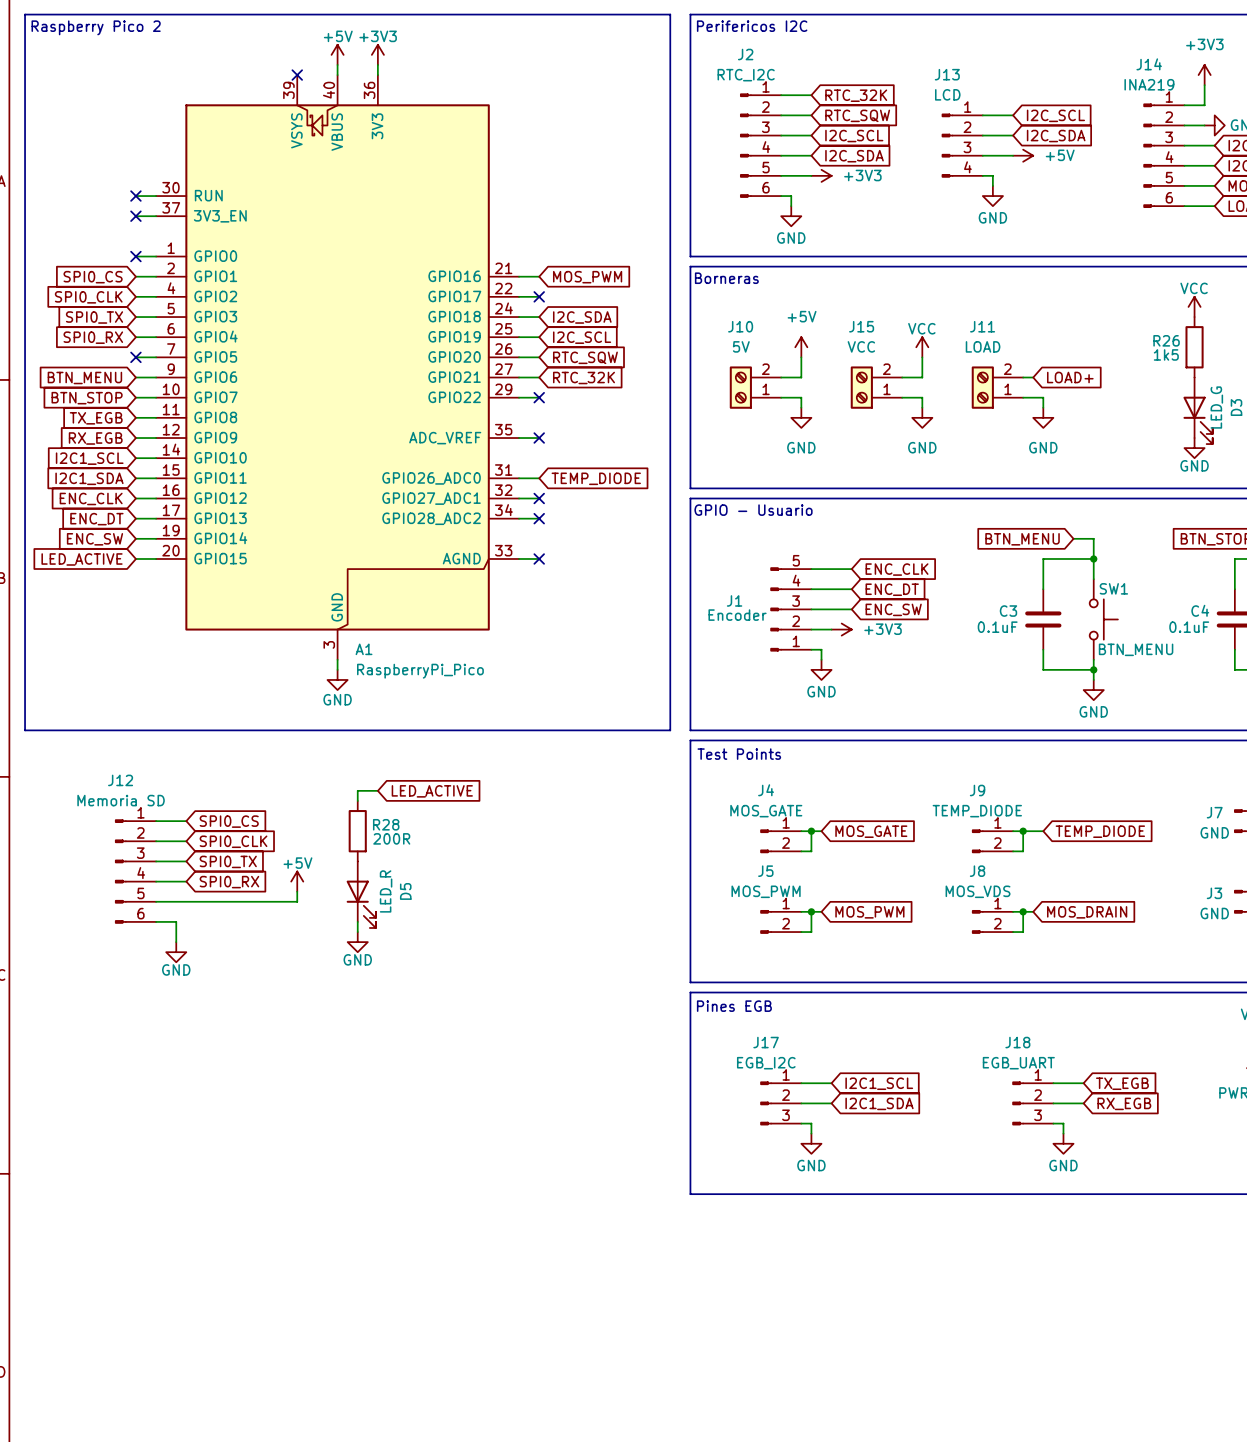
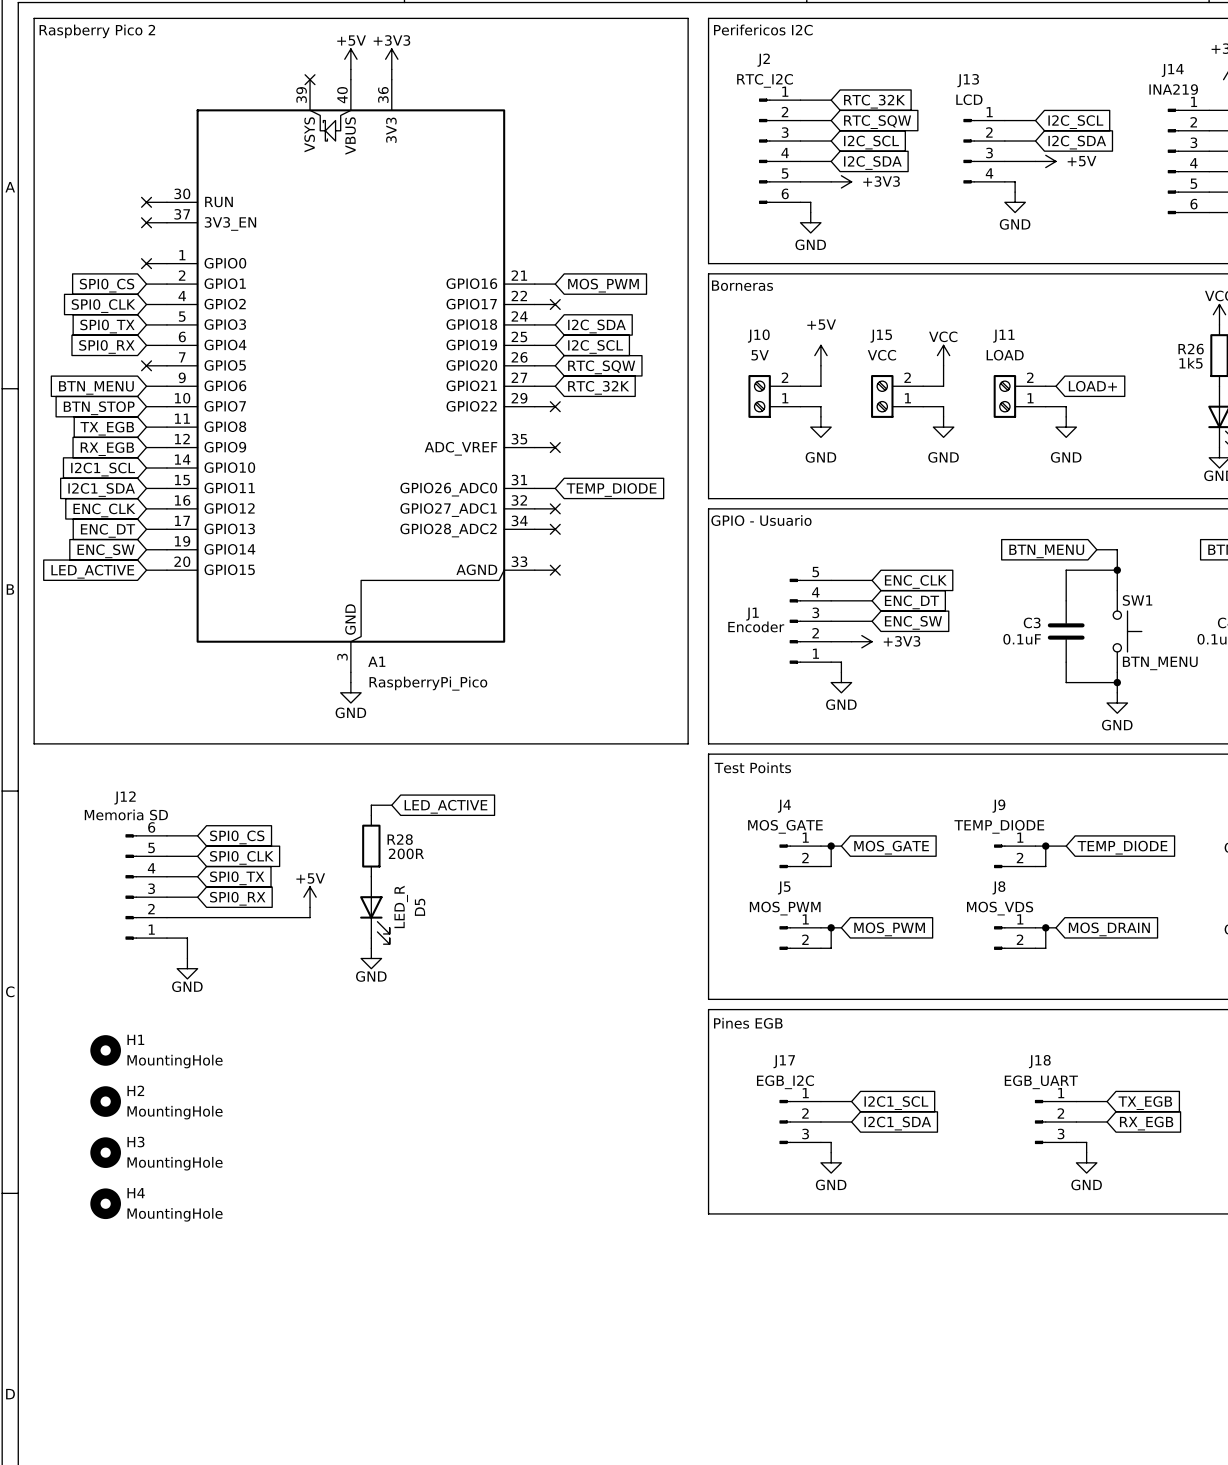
J12 flip: as is (120, 871) -> up-down (131, 886)
H1: none -> MountingHole (105, 1050)
H2: none -> MountingHole (105, 1101)
H3: none -> MountingHole (105, 1152)
H4: none -> MountingHole (105, 1203)

